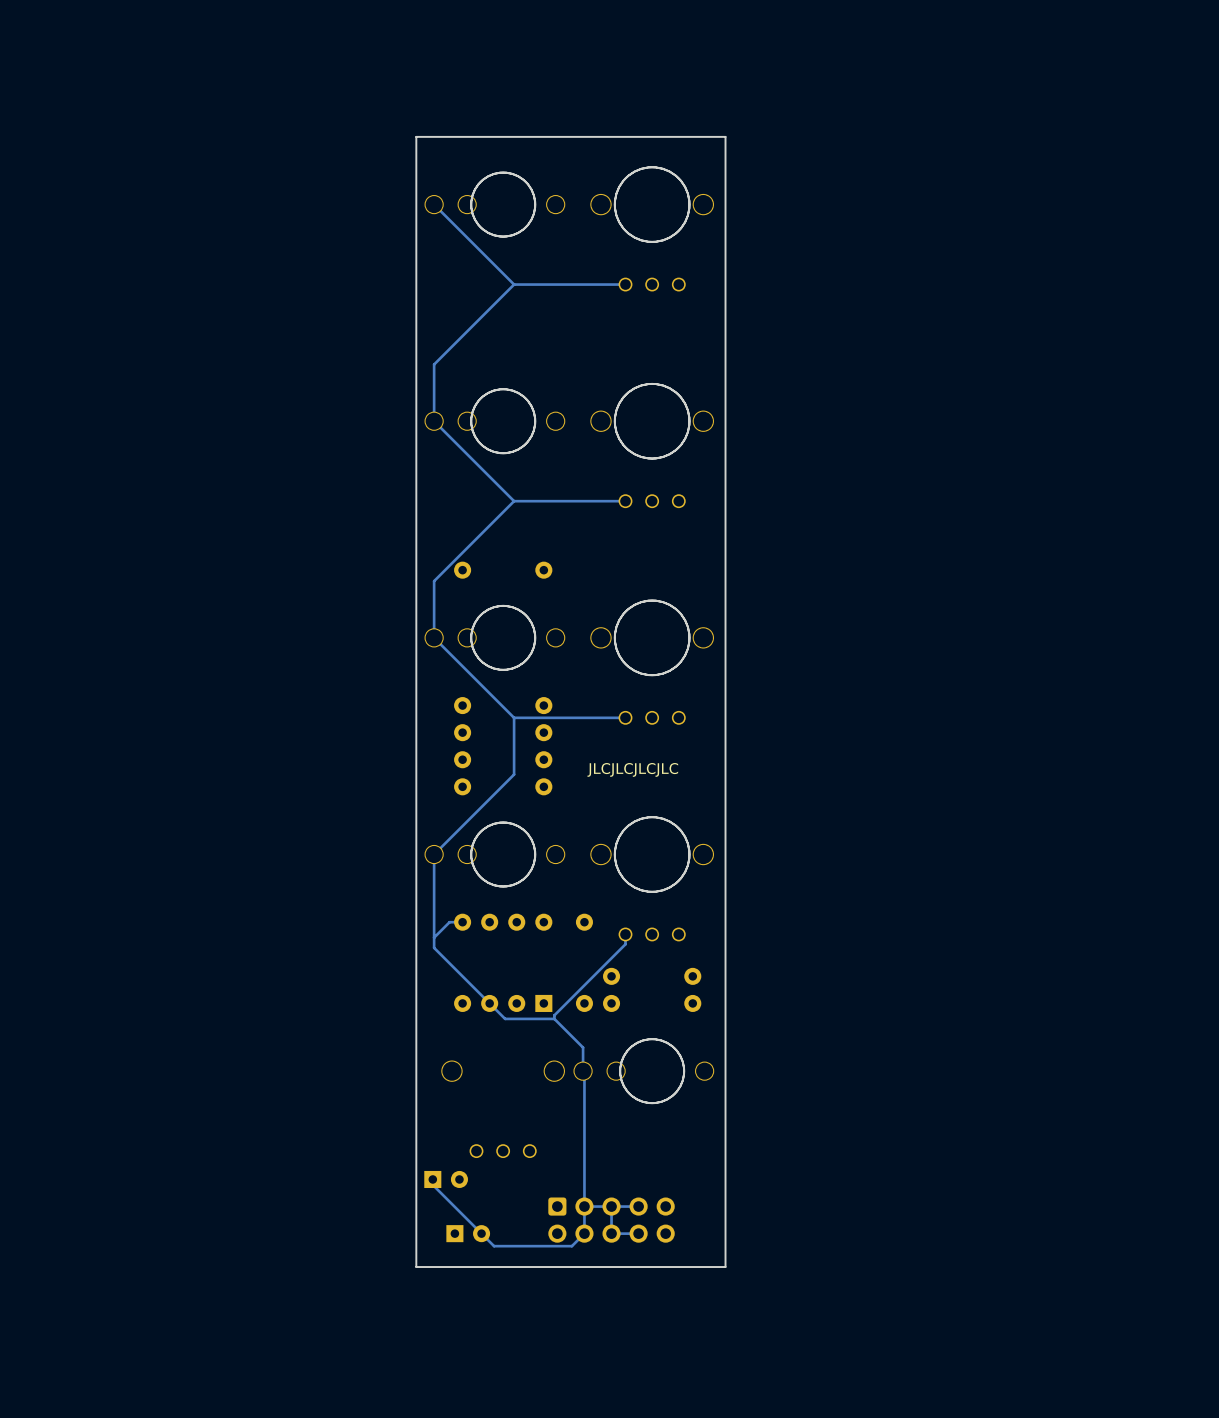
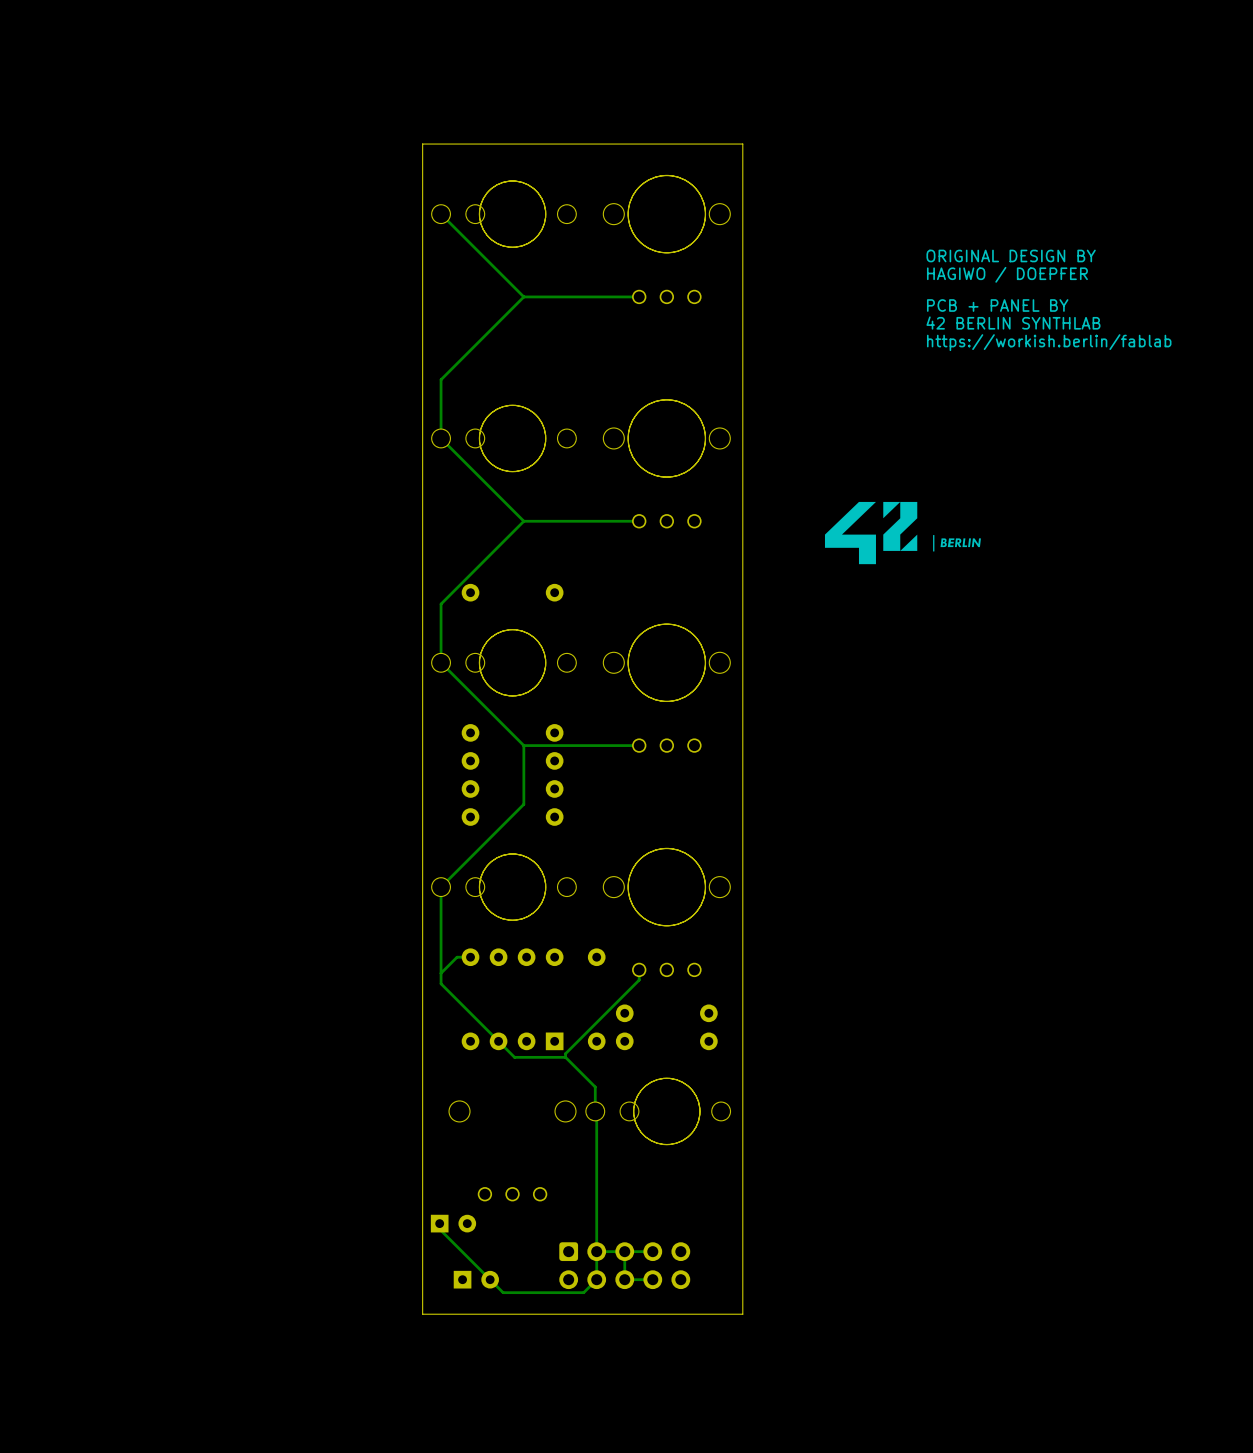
text: none -> ORIGINAL DESIGN BY (1011, 255)
text: none -> HAGIWO / DOEPFER (1007, 274)
text: none -> PCB + PANEL BY (997, 305)
text: none -> 42 BERLIN SYNTHLAB (1013, 323)
text: none -> https://workish.berlin/fablab (1049, 342)
drawing: none -> [824, 501, 918, 565]
drawing: none -> [933, 535, 981, 552]
text: JLCJLCJLCJLC (632, 769) -> none

